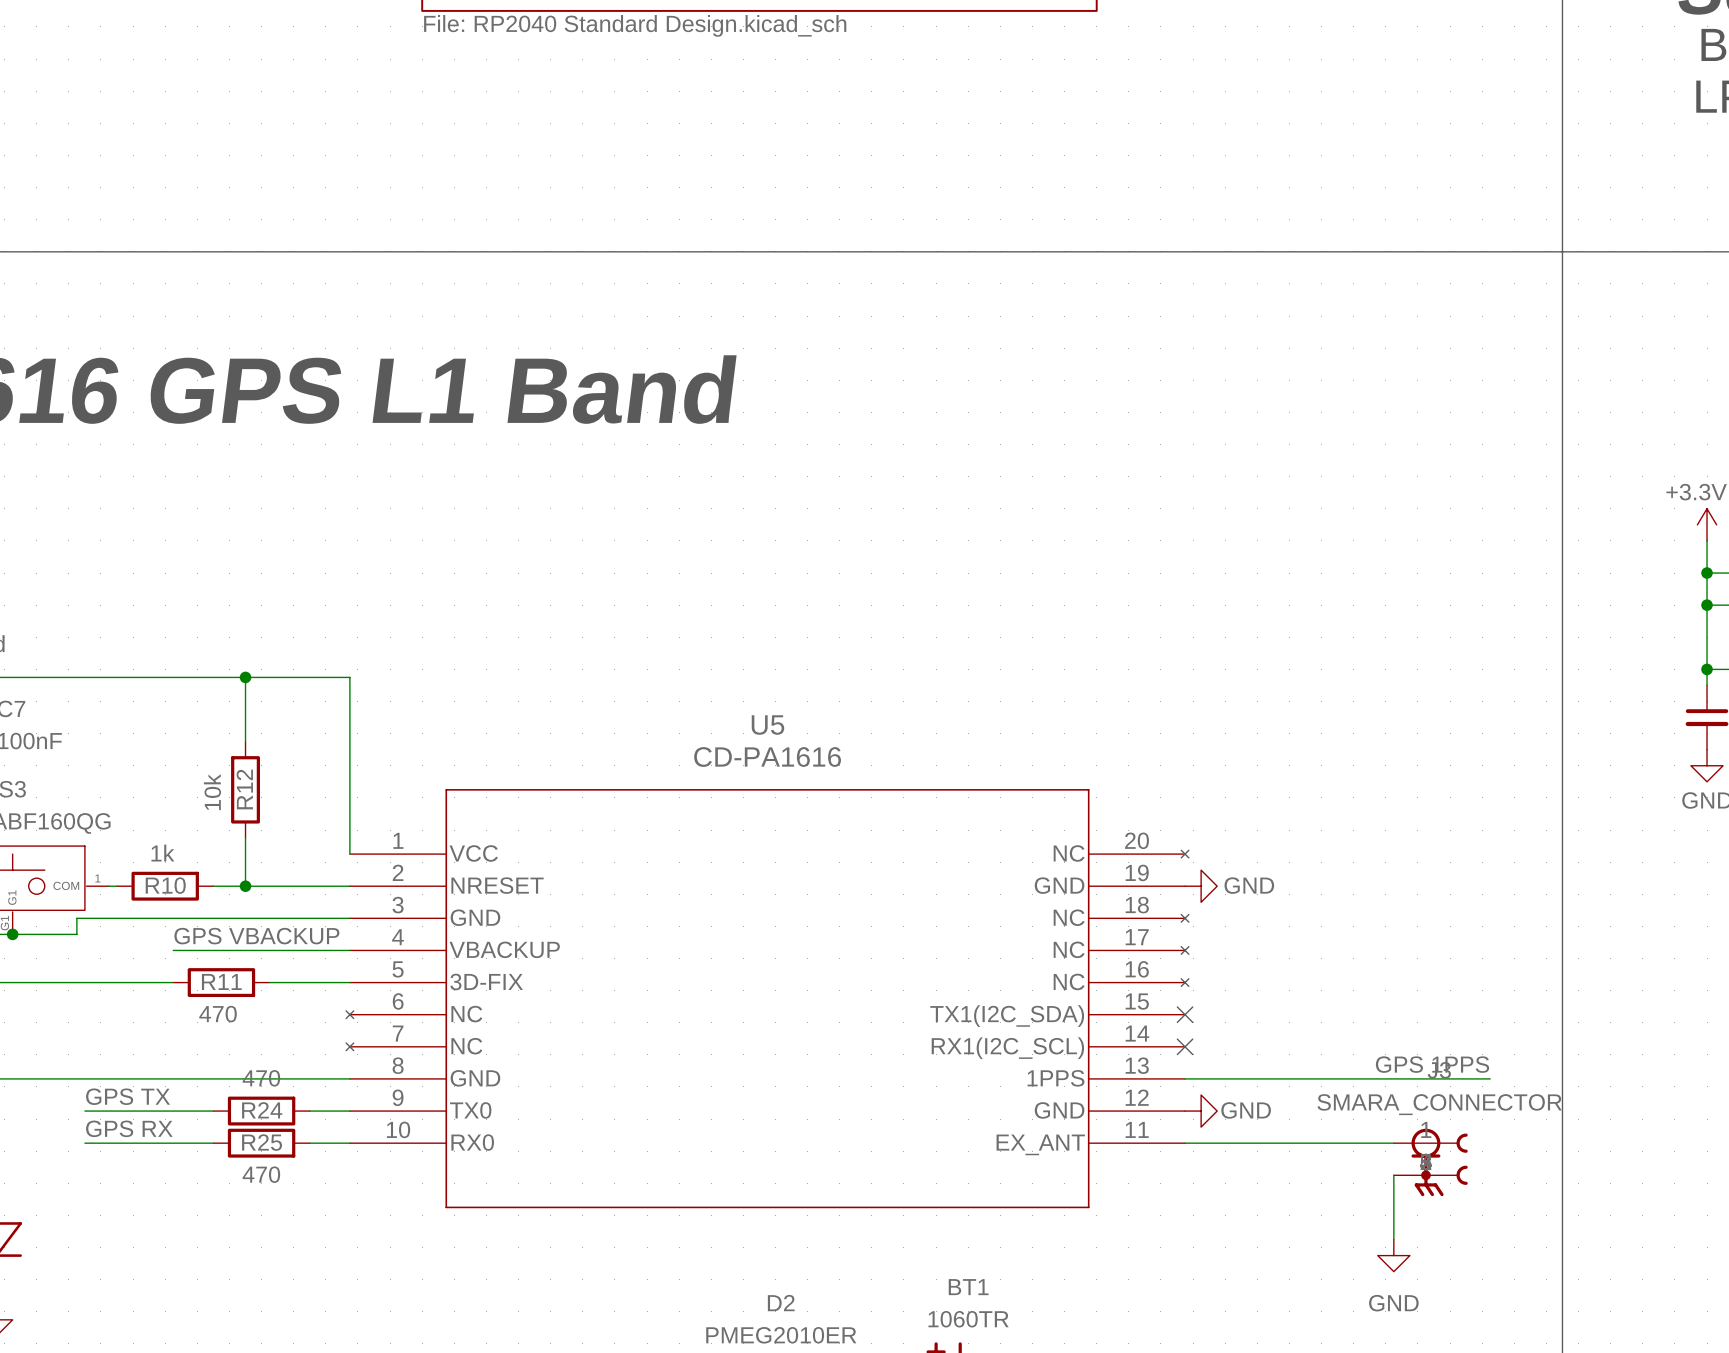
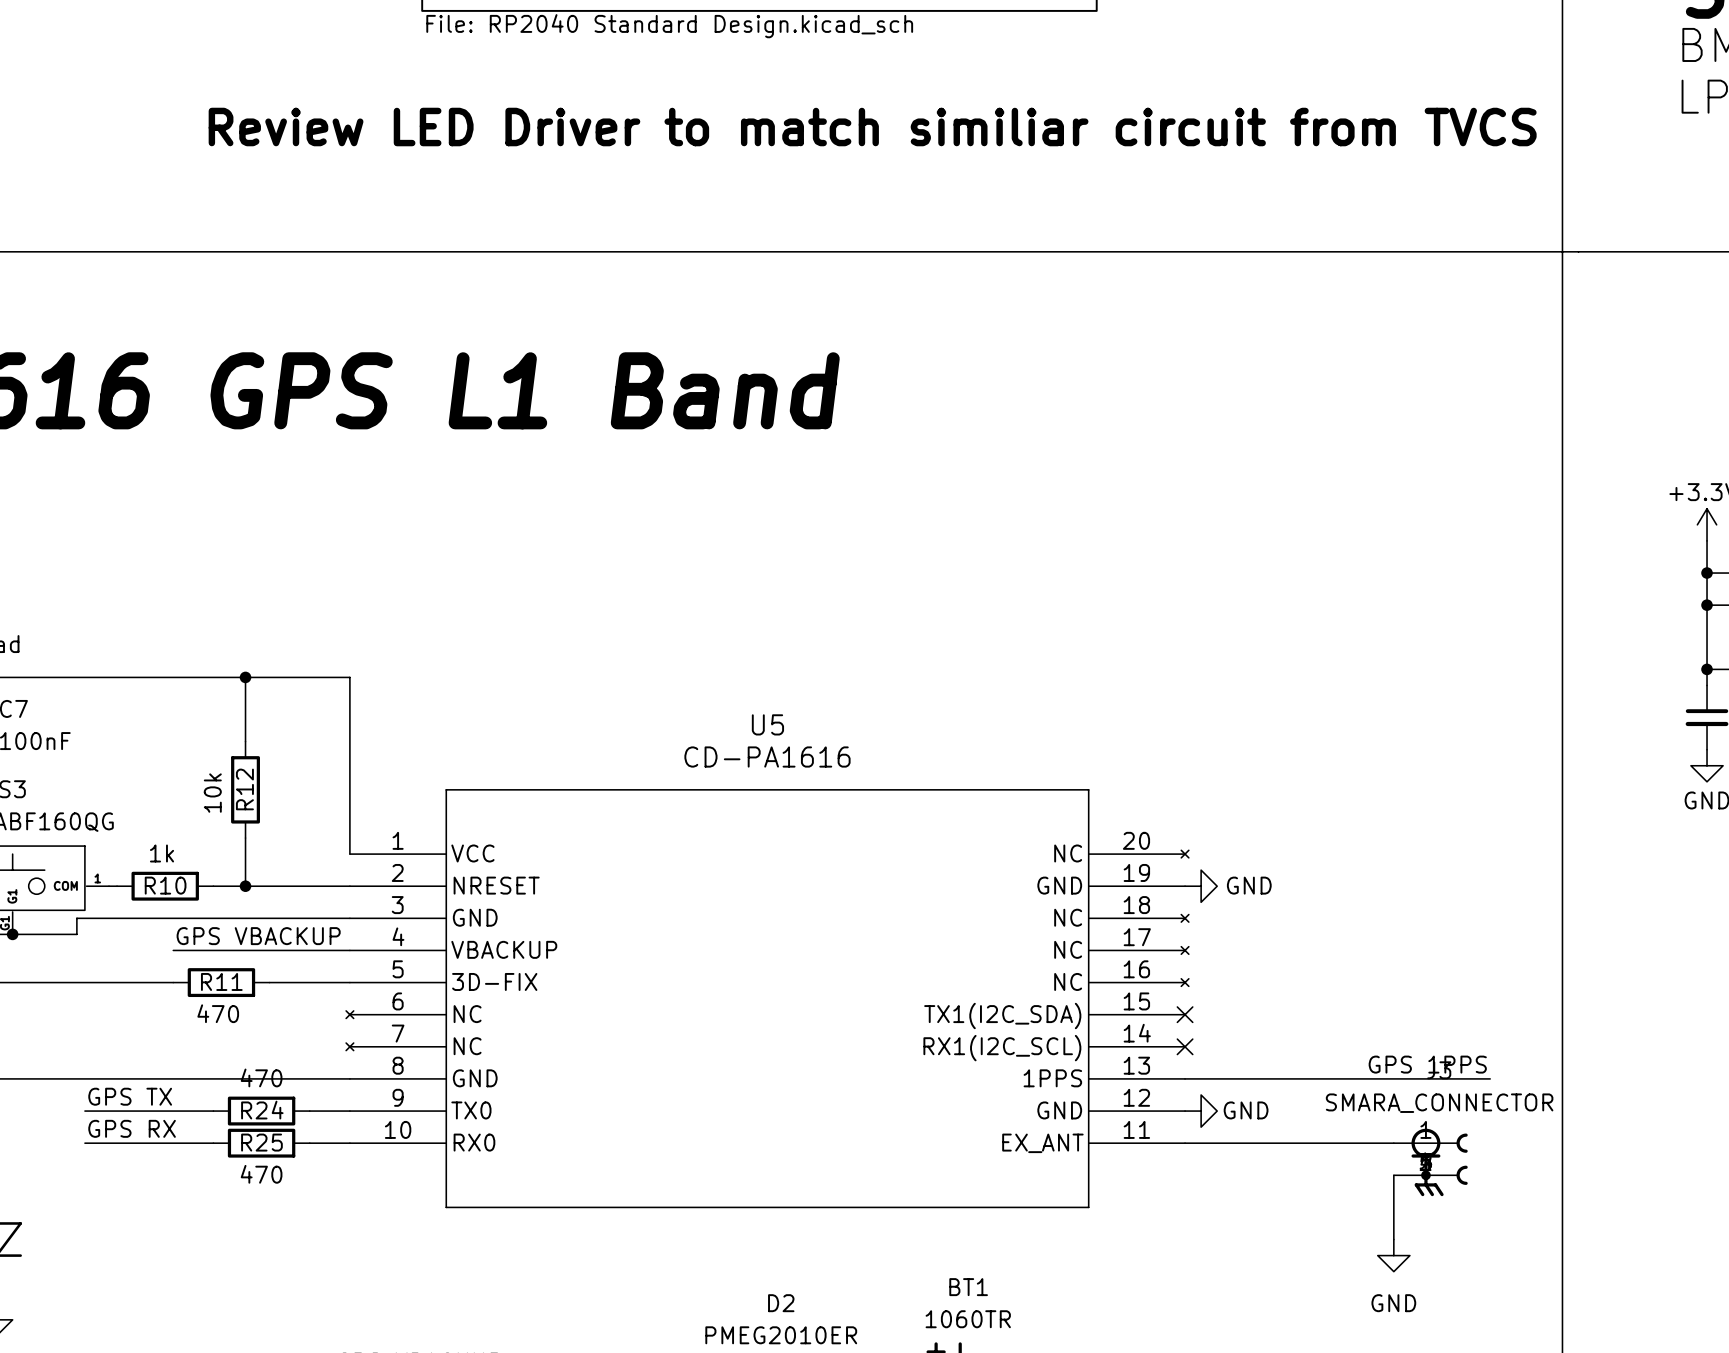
text: none -> Review LED Driver to match similiar circuit from TVCS (872, 127)

